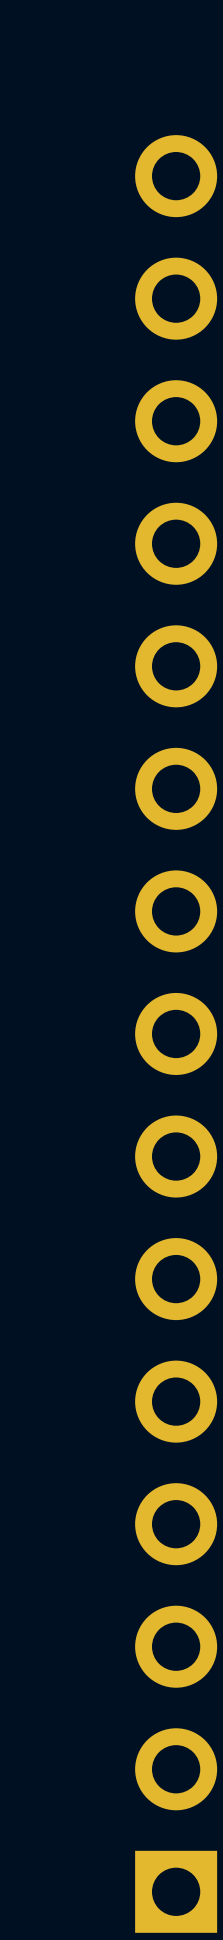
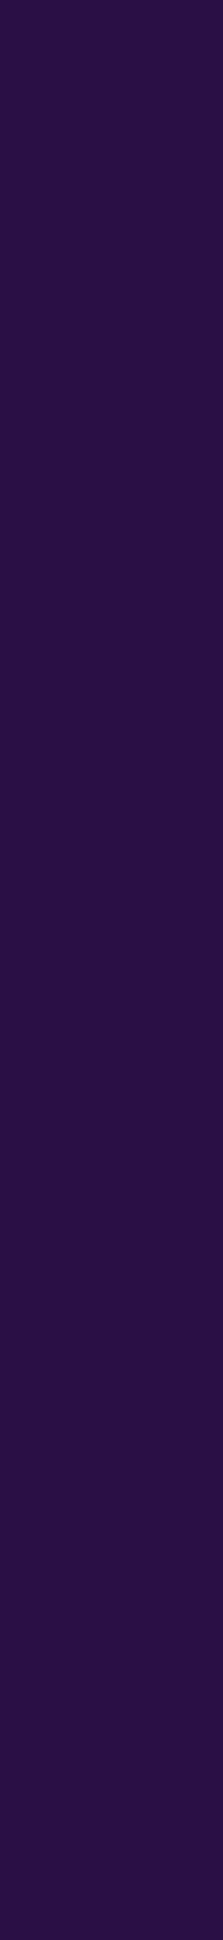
part: (176, 1033) -> none

